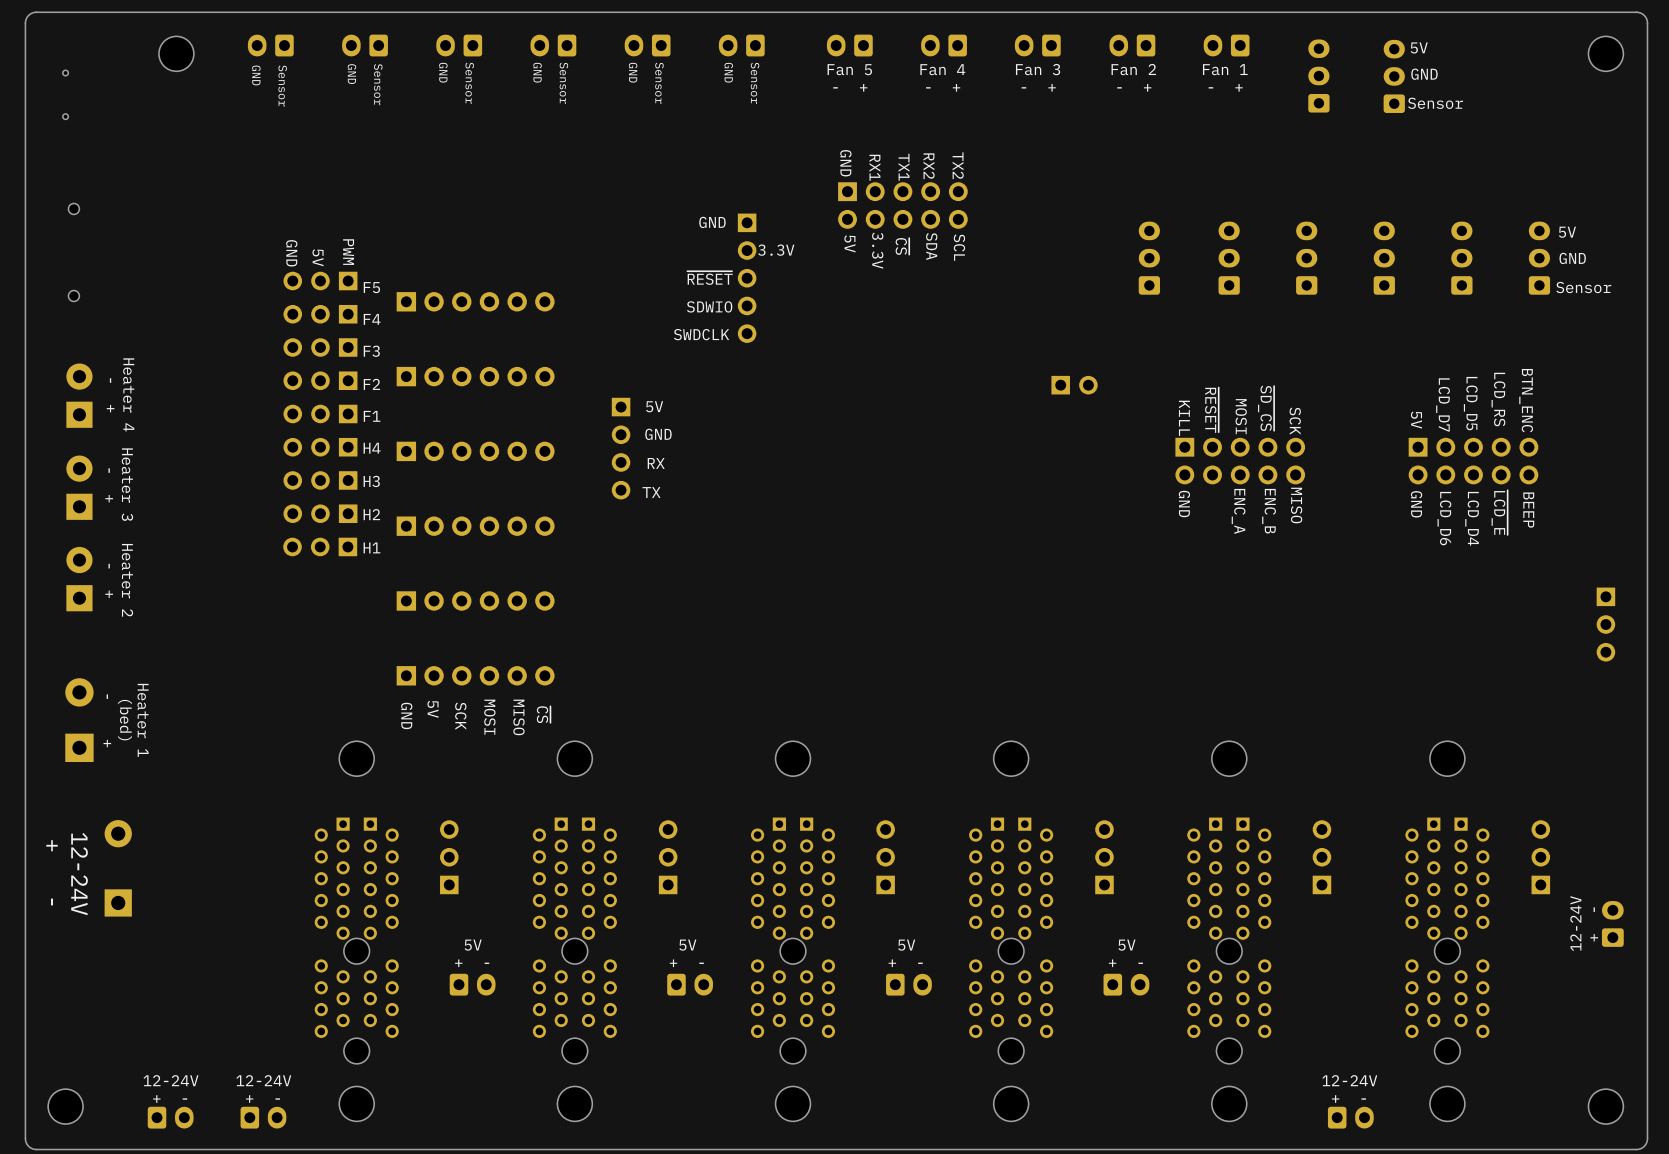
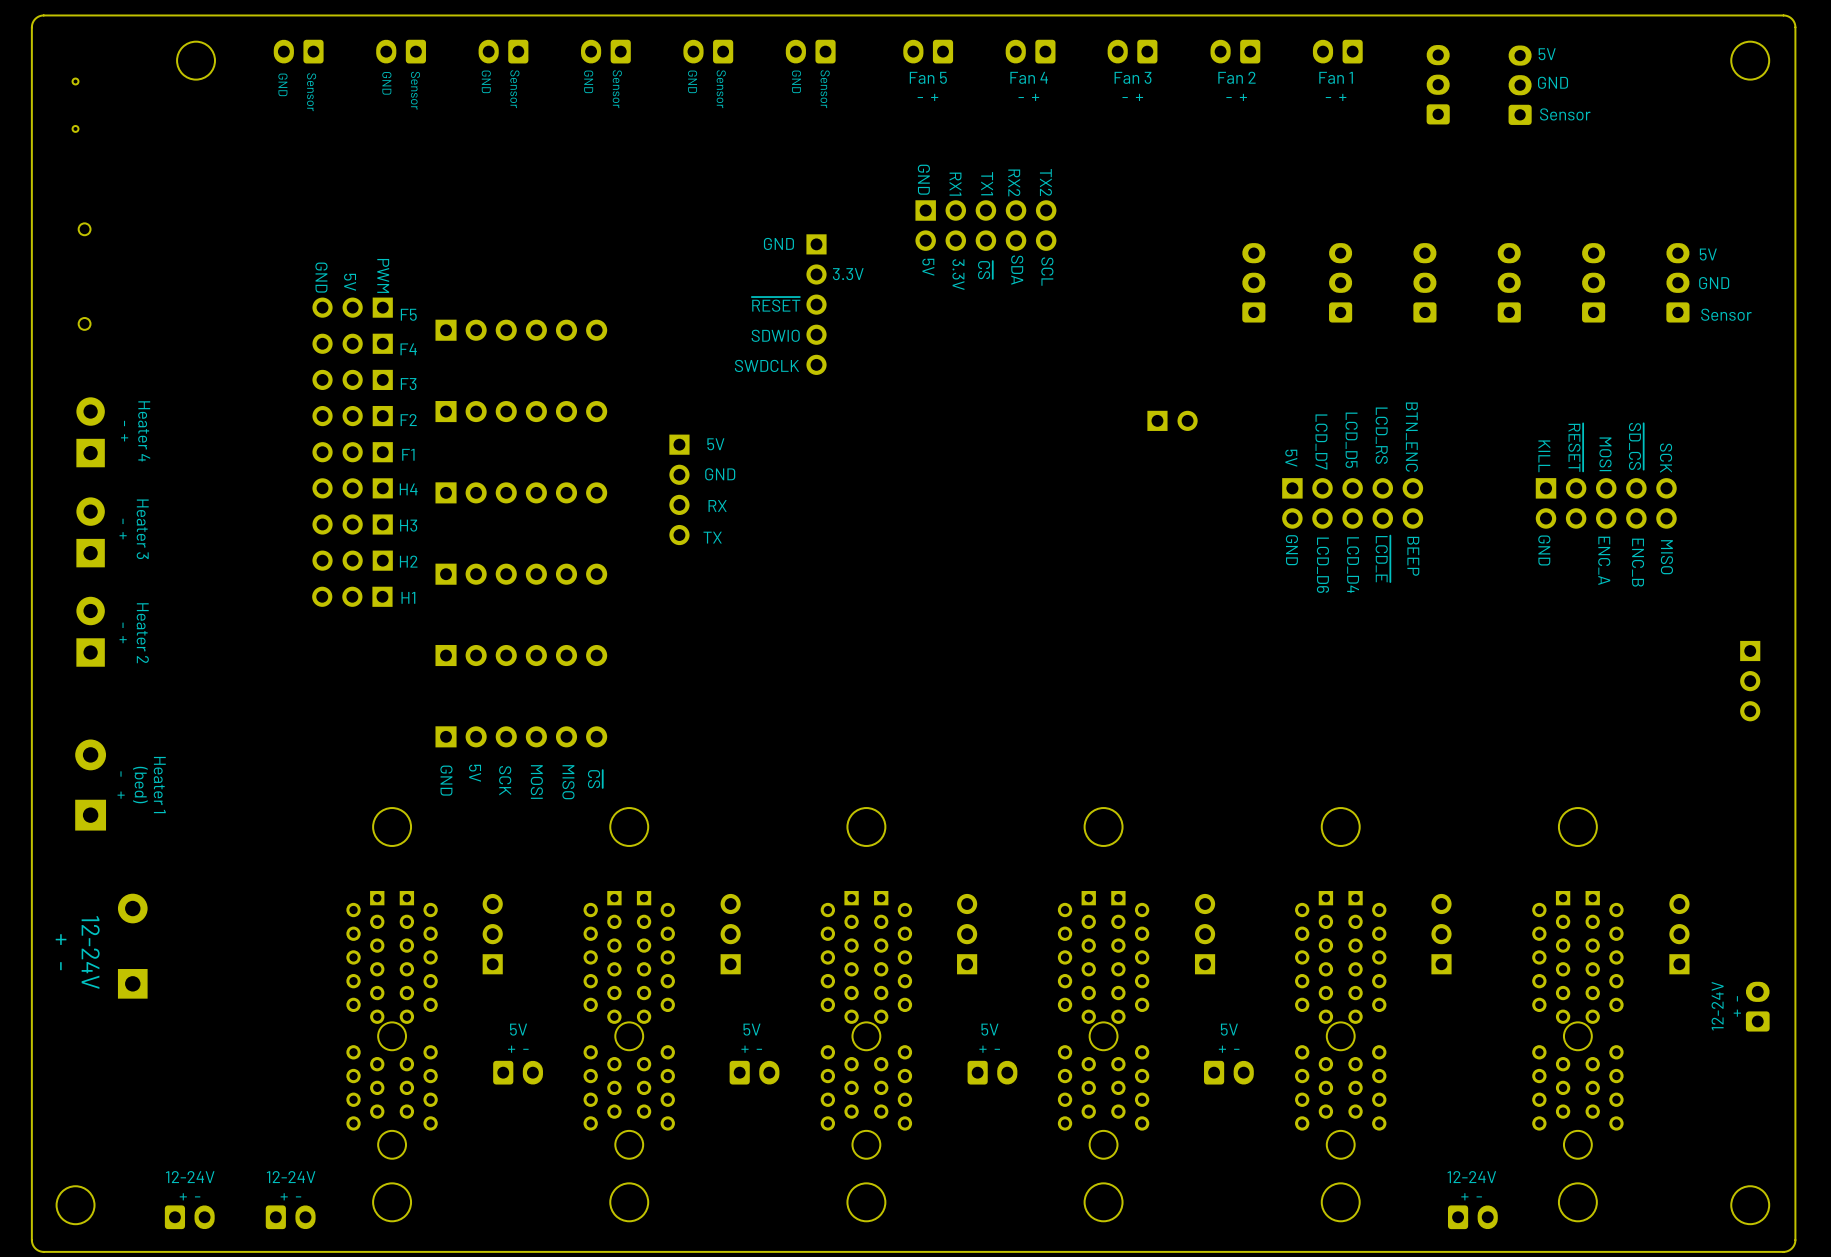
text position: LCD_RS (1498, 399) -> LCD_RS (1381, 435)
text position: BTN_ENC (1526, 400) -> BTN_ENC (1411, 437)
text position: LCD_D5 (1470, 403) -> LCD_D5 (1351, 440)
text position: LCD_D7 (1443, 404) -> LCD_D7 (1321, 441)
text position: ~{SD_CS} (1266, 408) -> ~{SD_CS} (1636, 446)
text position: ~{RESET} (1211, 410) -> ~{RESET} (1575, 447)
text position: MOSI (1241, 416) -> MOSI (1605, 454)
text position: KILL (1184, 418) -> KILL (1544, 456)
text position: 5V (1416, 420) -> 5V (1291, 458)
text position: SCK (1295, 421) -> SCK (1666, 458)
text: MISO (1296, 505) -> BEEP (1413, 556)
text: BEEP (1528, 510) -> MISO (1666, 557)
text position: ENC_A (1238, 511) -> ENC_A (1604, 560)
text position: ENC_B (1269, 511) -> ENC_B (1638, 562)
text position: ~{LCD_E} (1499, 512) -> ~{LCD_E} (1382, 558)
text position: LCD_D6 (1444, 518) -> LCD_D6 (1322, 565)
text position: LCD_D4 (1472, 518) -> LCD_D4 (1353, 565)

